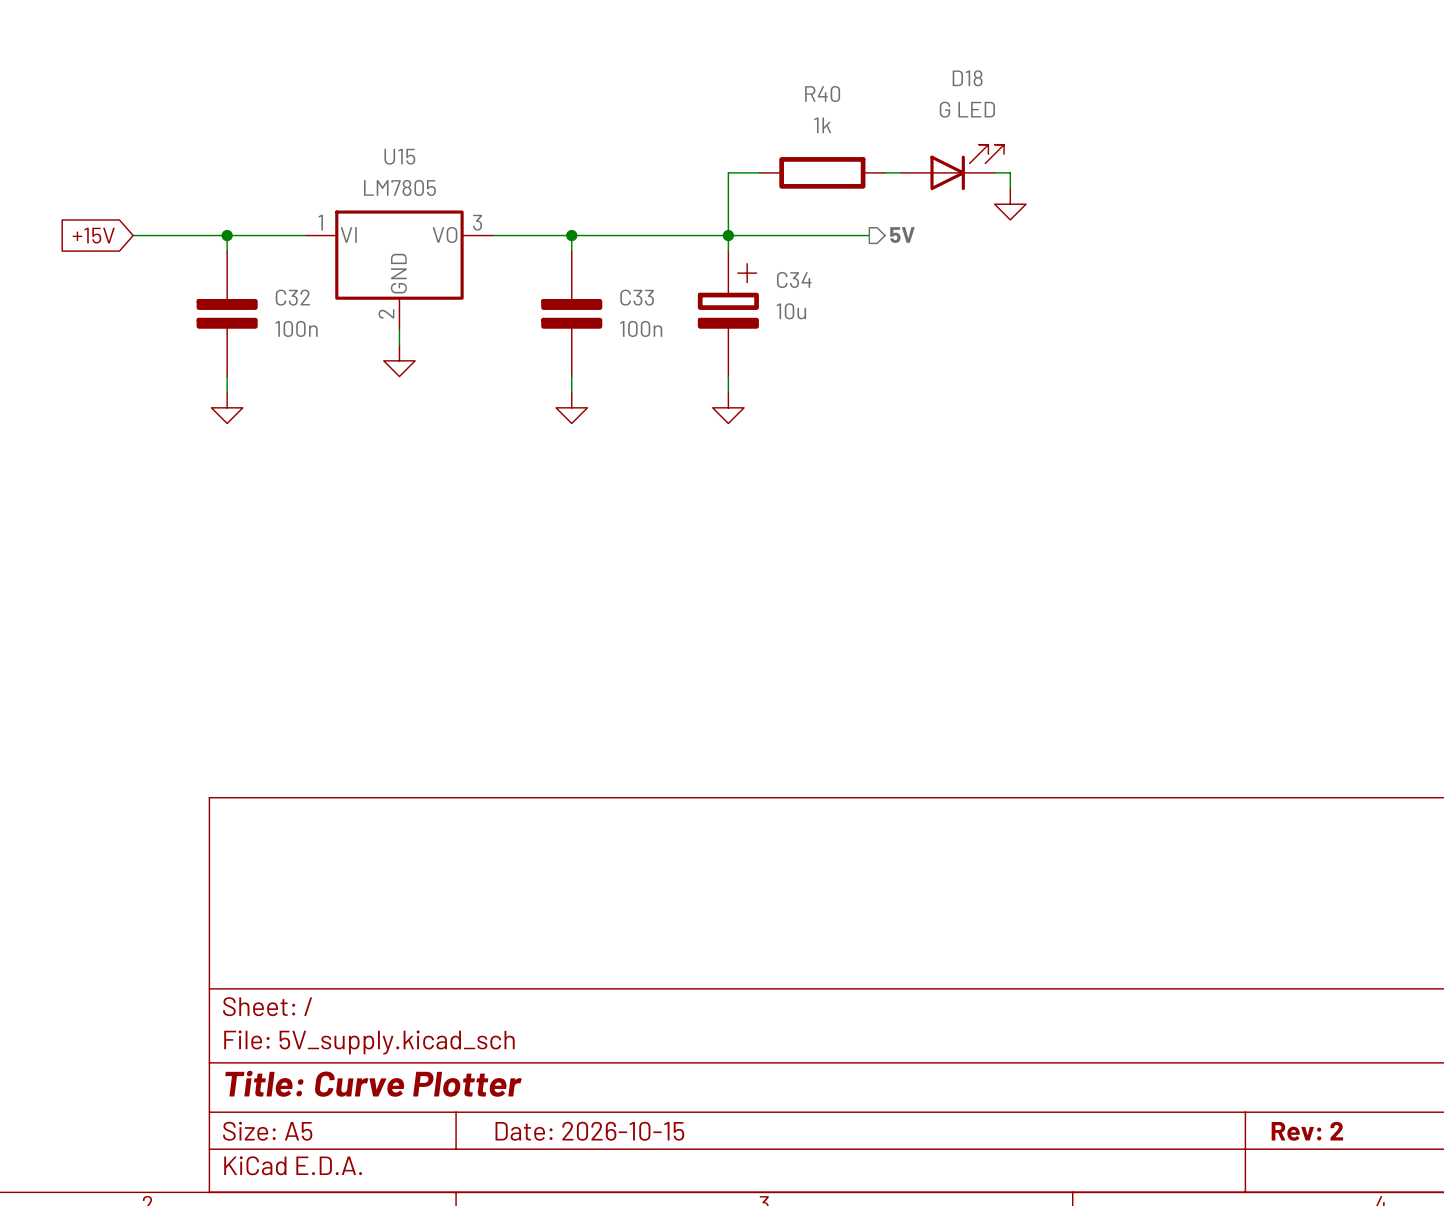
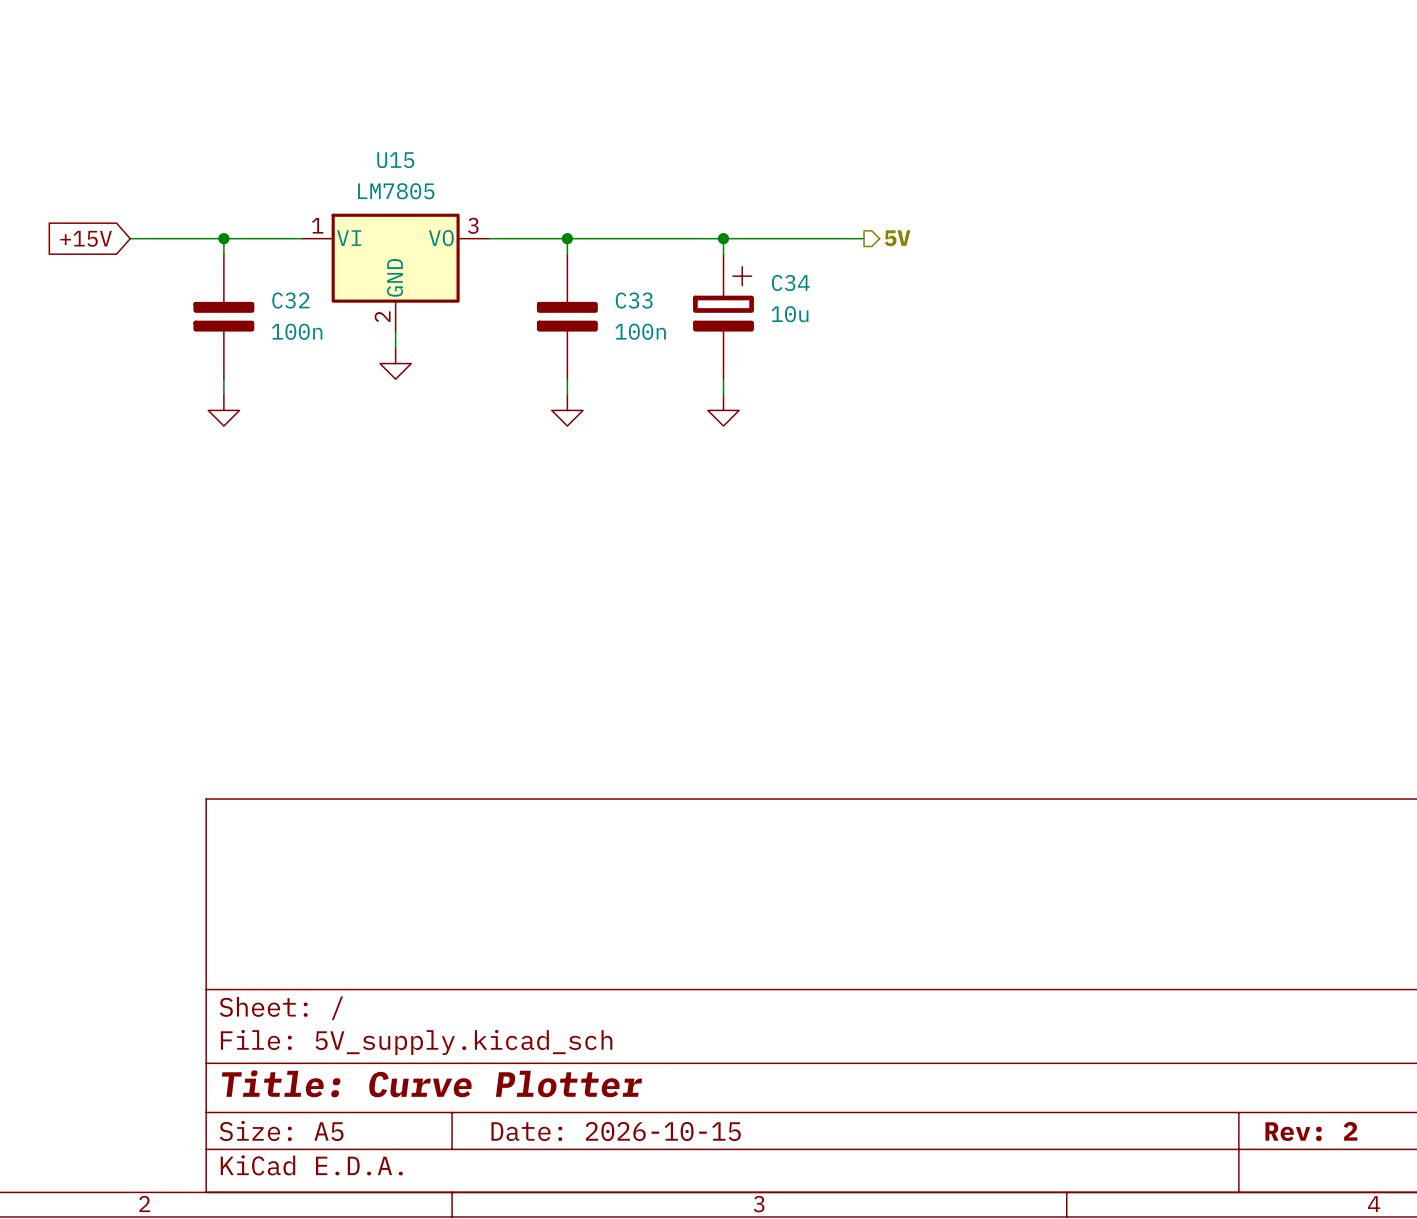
D18: G LED (952, 167) -> none
wire: (759, 172) (728, 172) (728, 235) -> none
R40: 1k (822, 172) -> none
wire: (885, 172) (900, 172) -> none
wire: (994, 172) (1010, 172) (1010, 188) -> none
power symbol: (1010, 204) -> none

